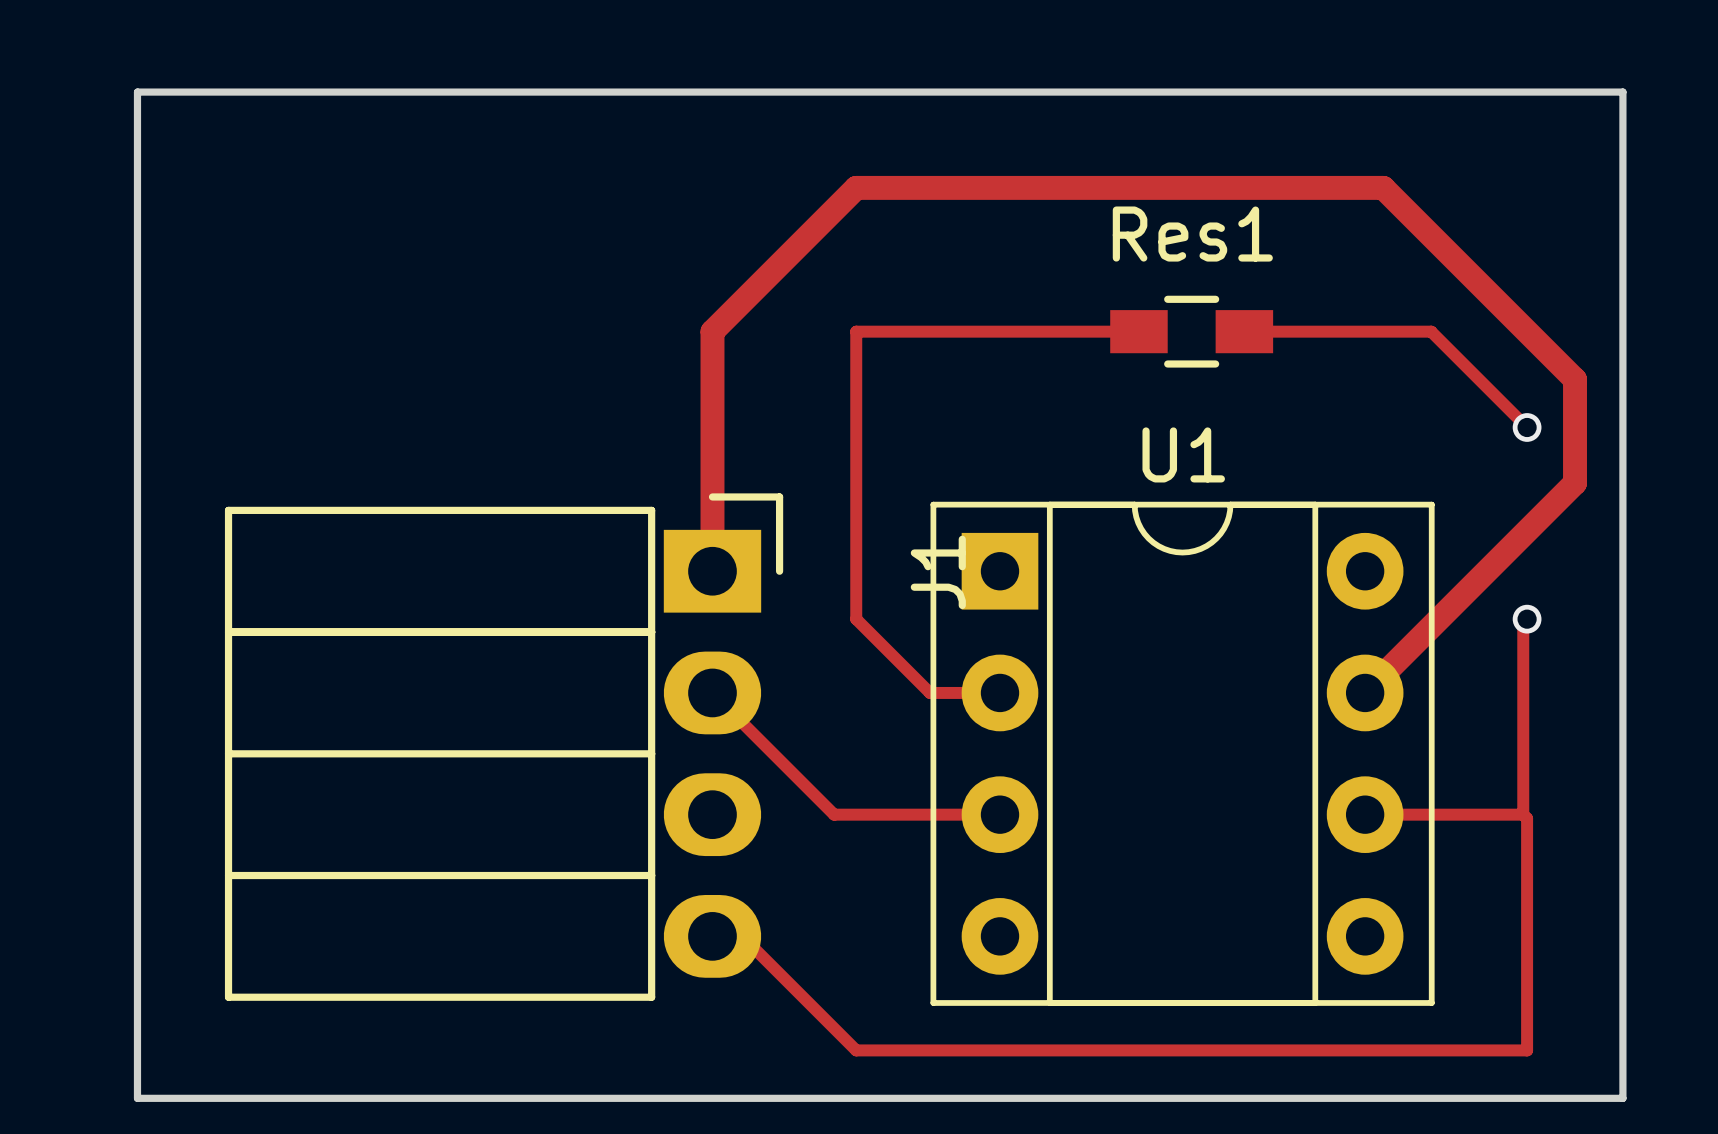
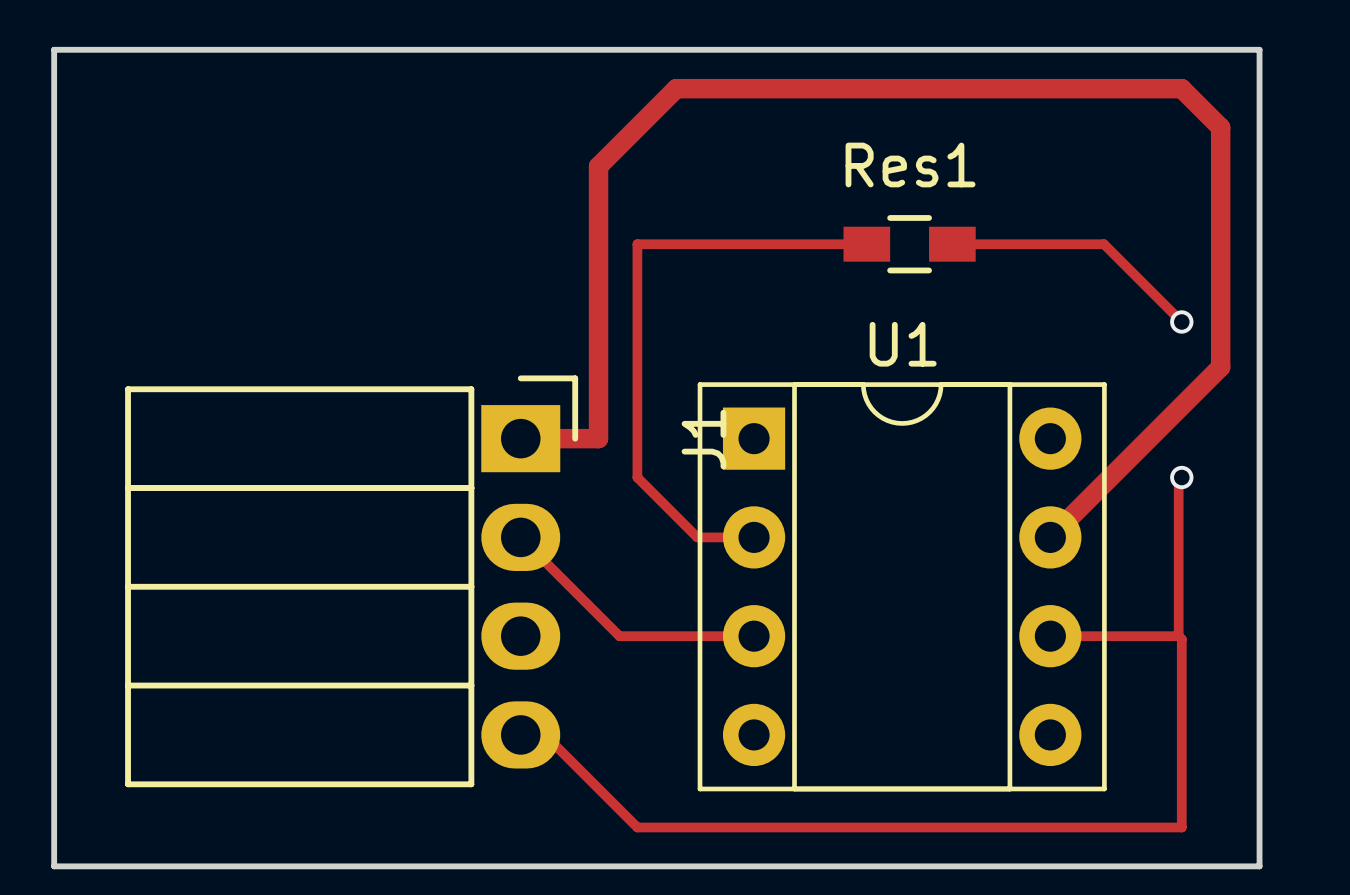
track: (856, 187) (1383, 187) (1575, 379) -> (637, 127) (676, 88) (1181, 88) (1220, 127) (1220, 283)
track: (808, 235) (712, 331) (712, 571) -> (598, 166) (598, 438) (520, 438)

